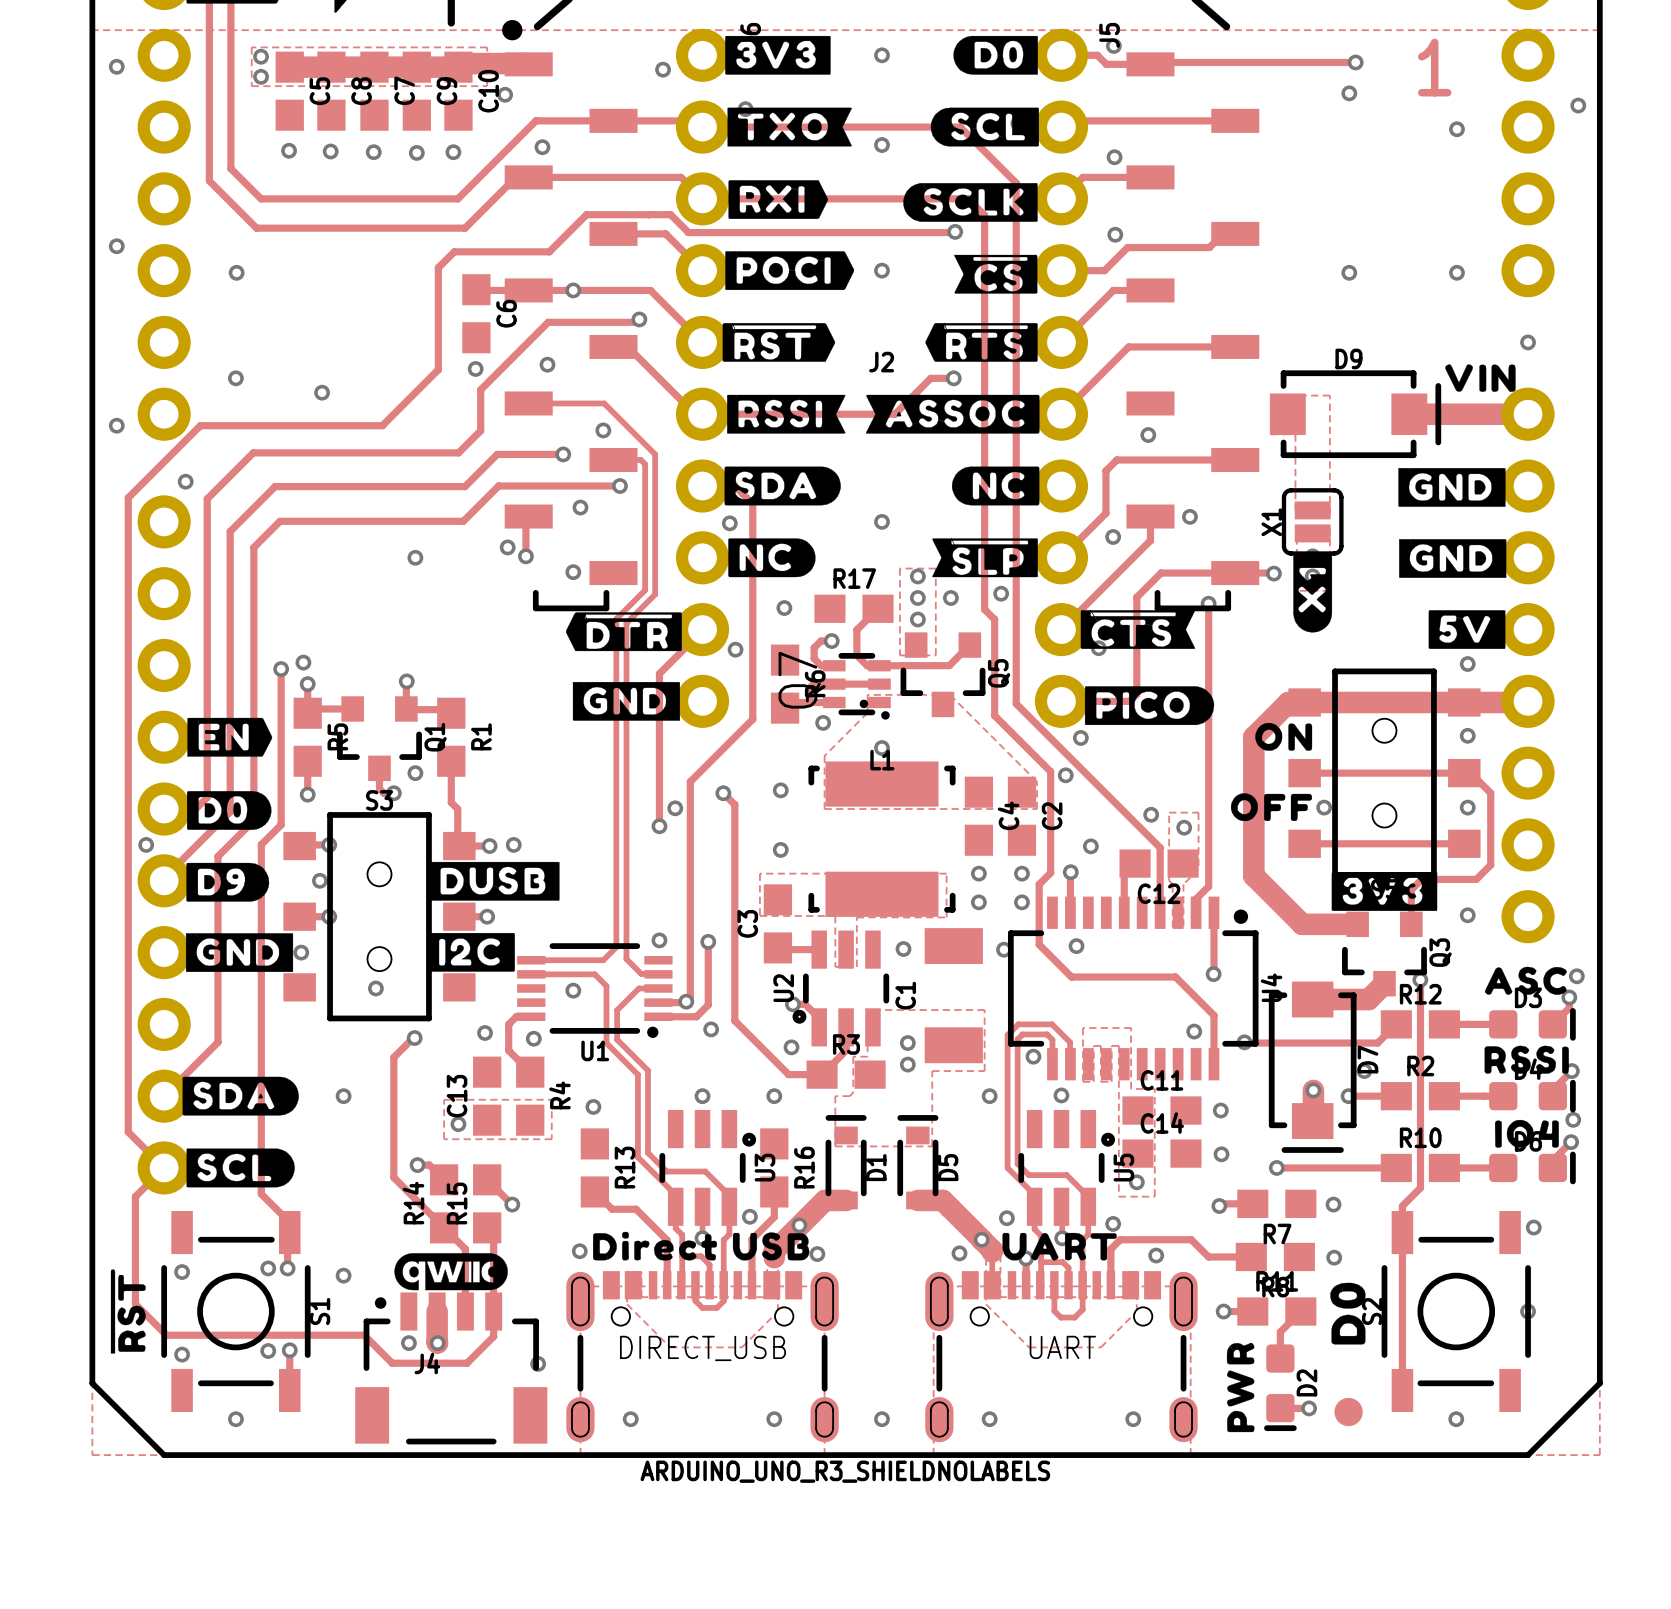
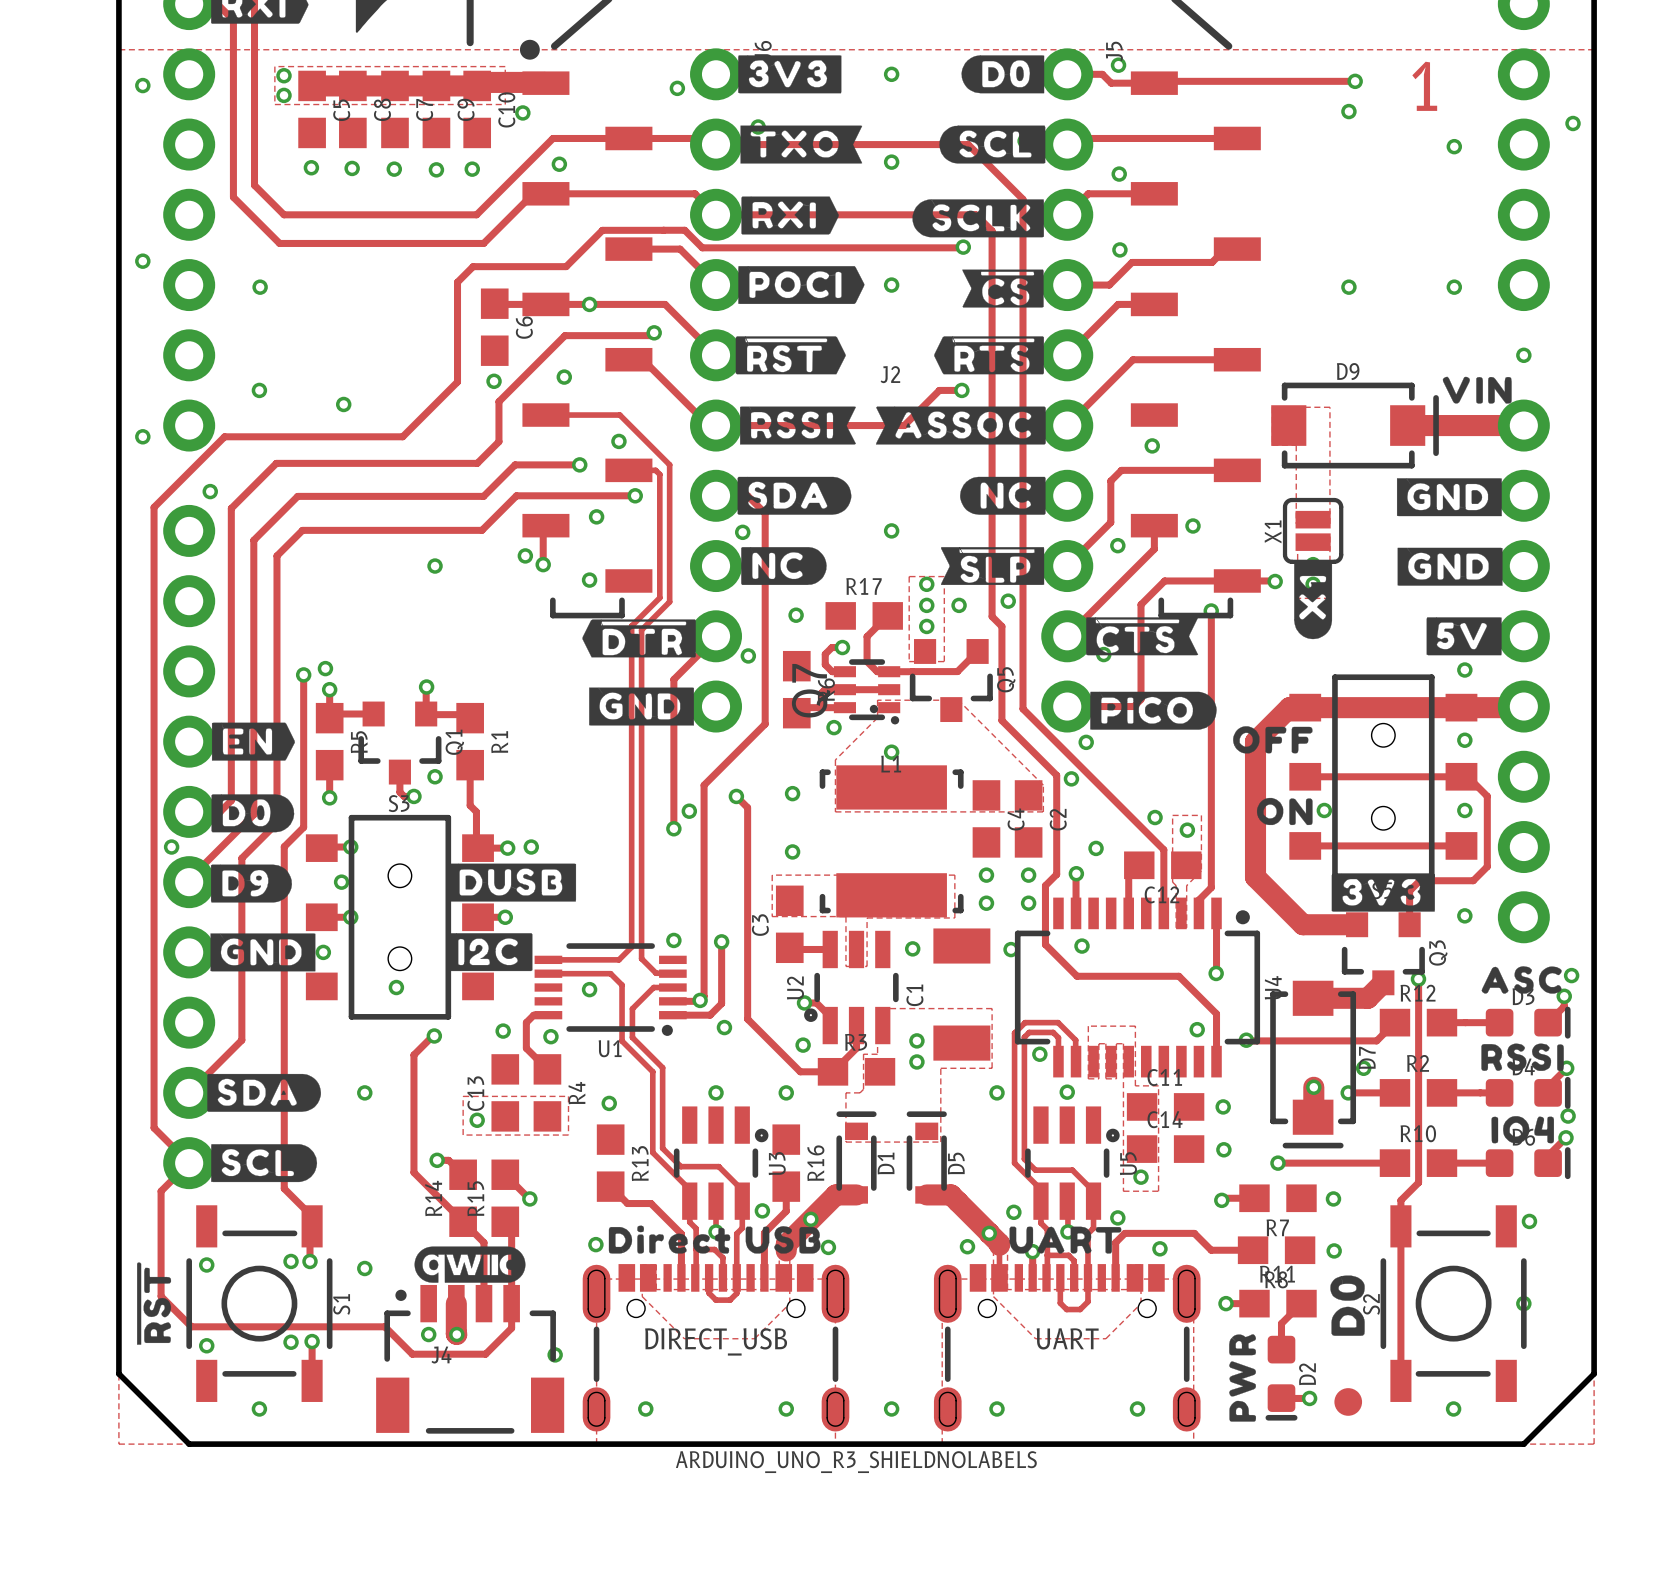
drawing position: (1283, 736) -> (1284, 811)
drawing position: (1271, 807) -> (1272, 739)

